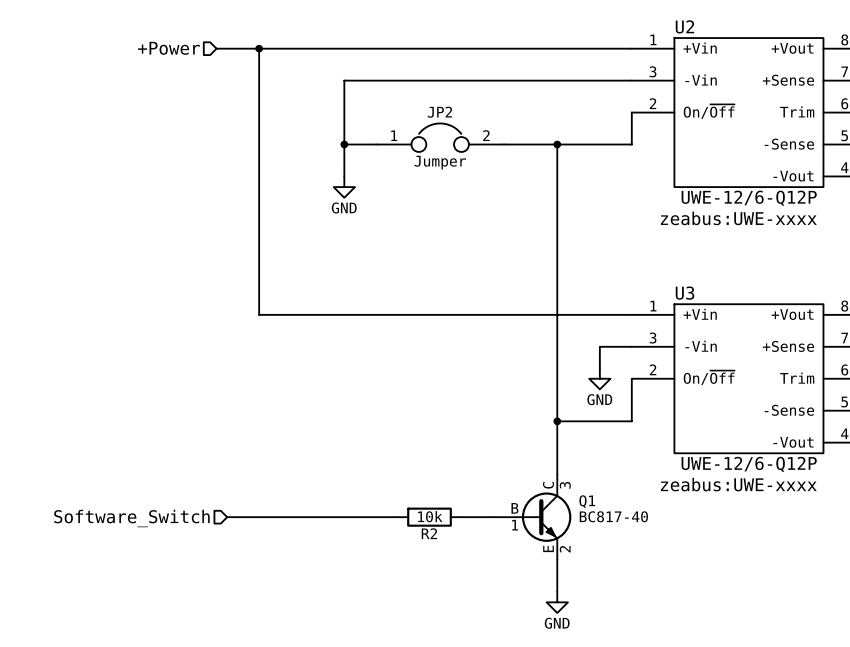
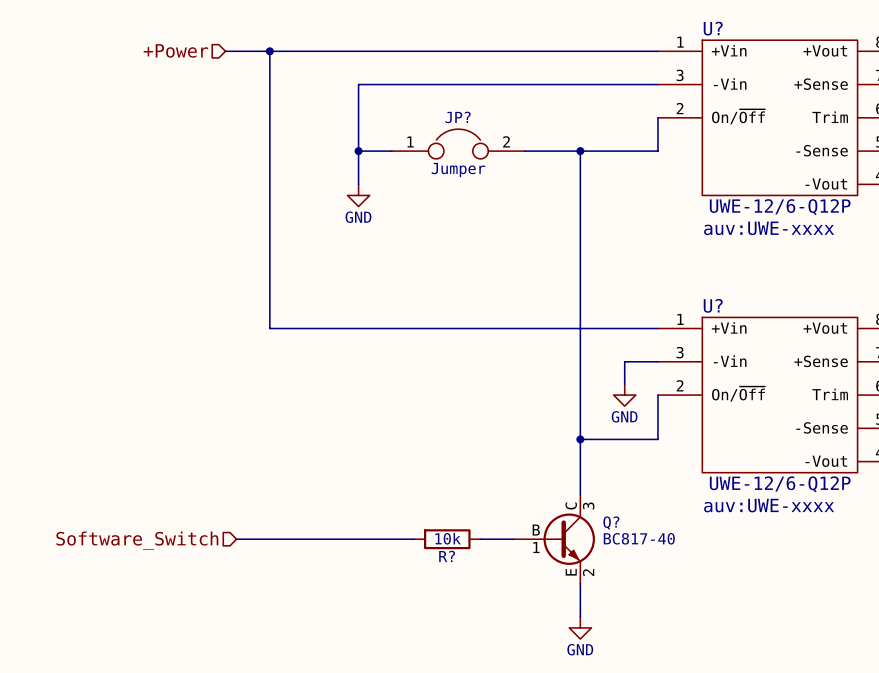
U2 name: U2 (684, 26) -> U? (713, 28)
JP2 name: JP2 (439, 112) -> JP? (458, 117)
U2 text: zeabus:UWE-xxxx (738, 218) -> auv:UWE-xxxx (769, 228)
U3 name: U3 (685, 293) -> U? (713, 305)
U3 text: zeabus:UWE-xxxx (738, 484) -> auv:UWE-xxxx (769, 505)
Q1 name: Q1 (587, 501) -> Q? (611, 523)
R2 name: R2 (429, 533) -> R? (447, 556)

